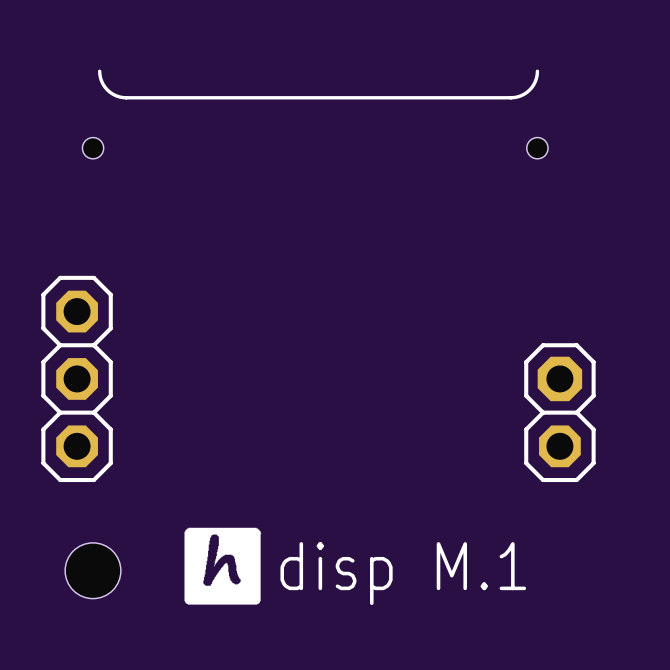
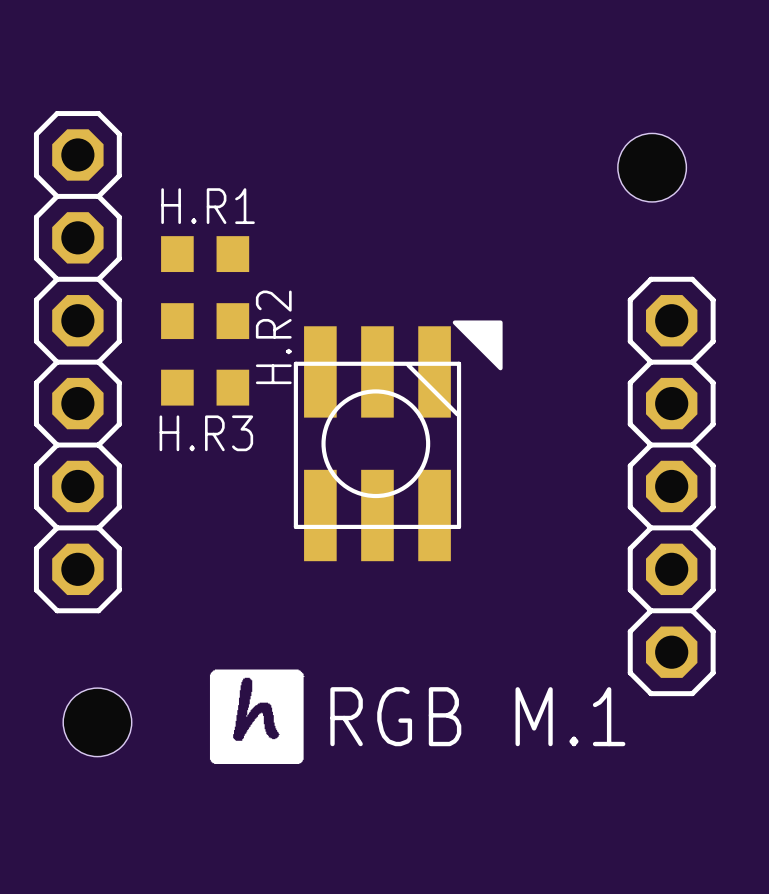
part: (315, 114) -> none
hole: none -> (652, 167)
H.R1: none -> (205, 254)
H.R2: none -> (205, 321)
part: none -> (77, 362)
H.R3: none -> (205, 387)
part: none -> (398, 440)
part: (77, 378) -> none
part: none -> (671, 486)
part: (559, 412) -> none
text: disp M.1 (403, 573) -> RGB M.1 (477, 716)

